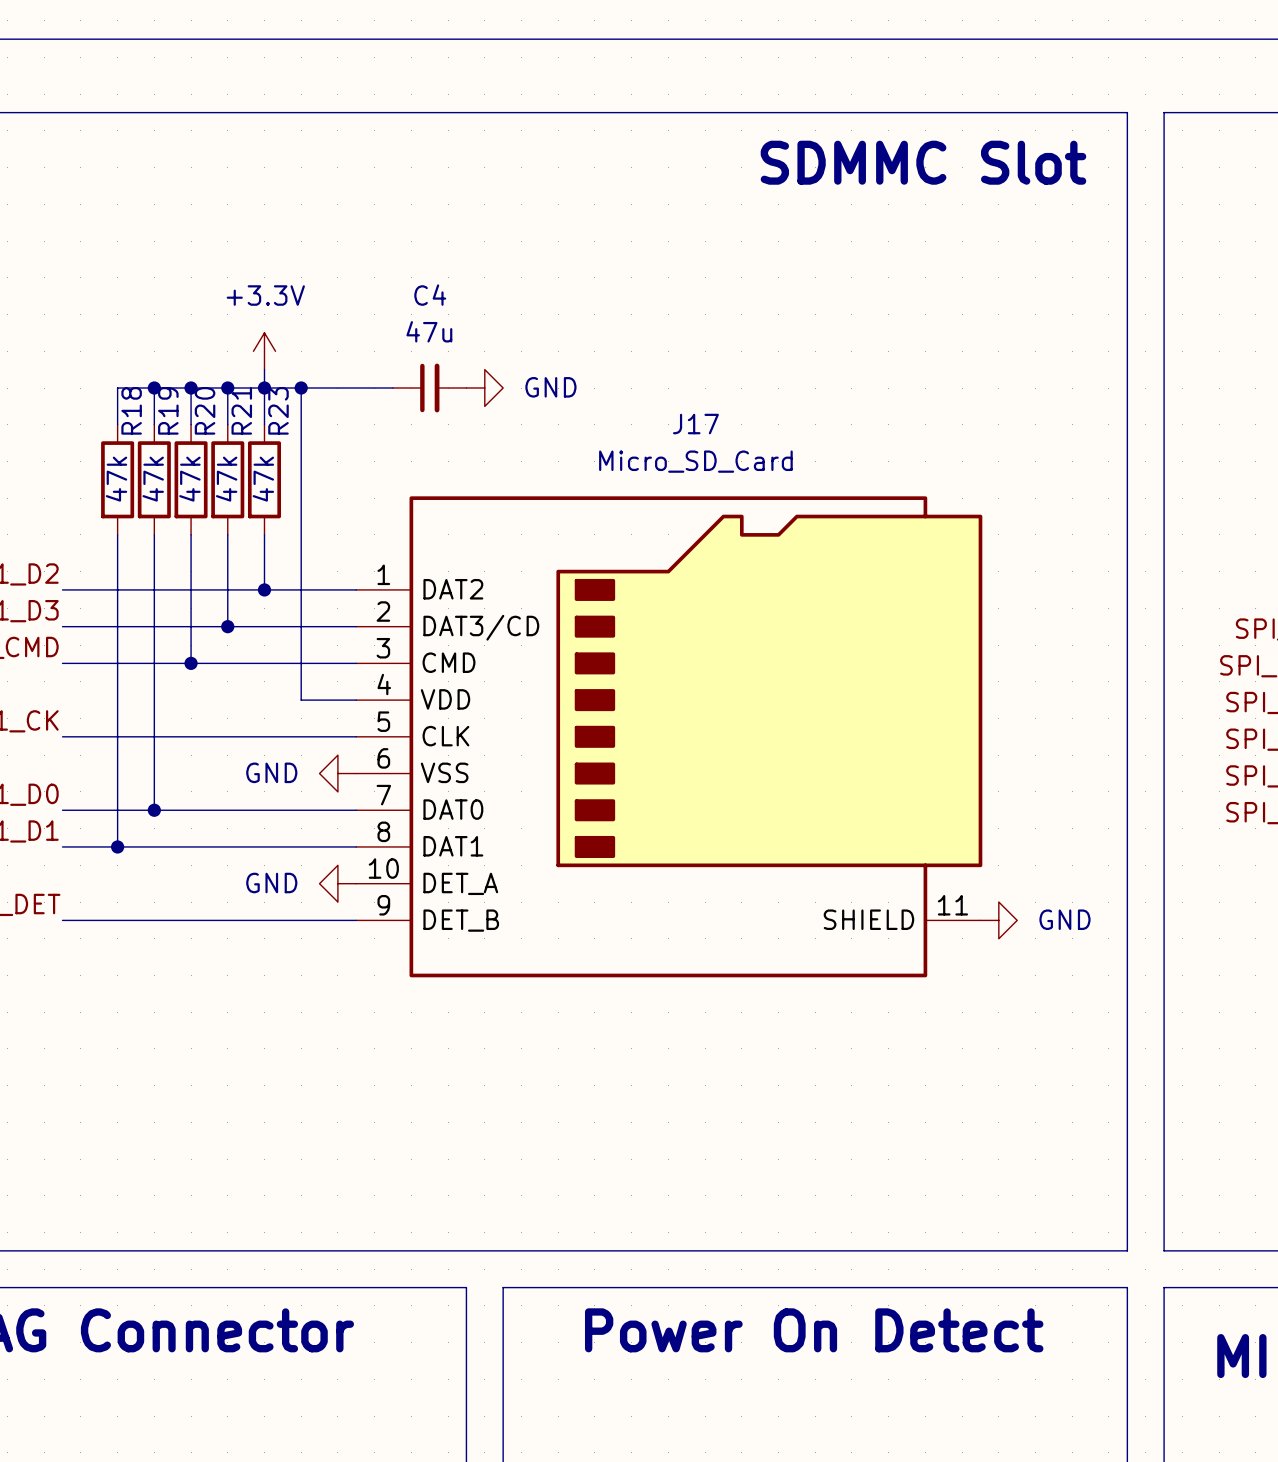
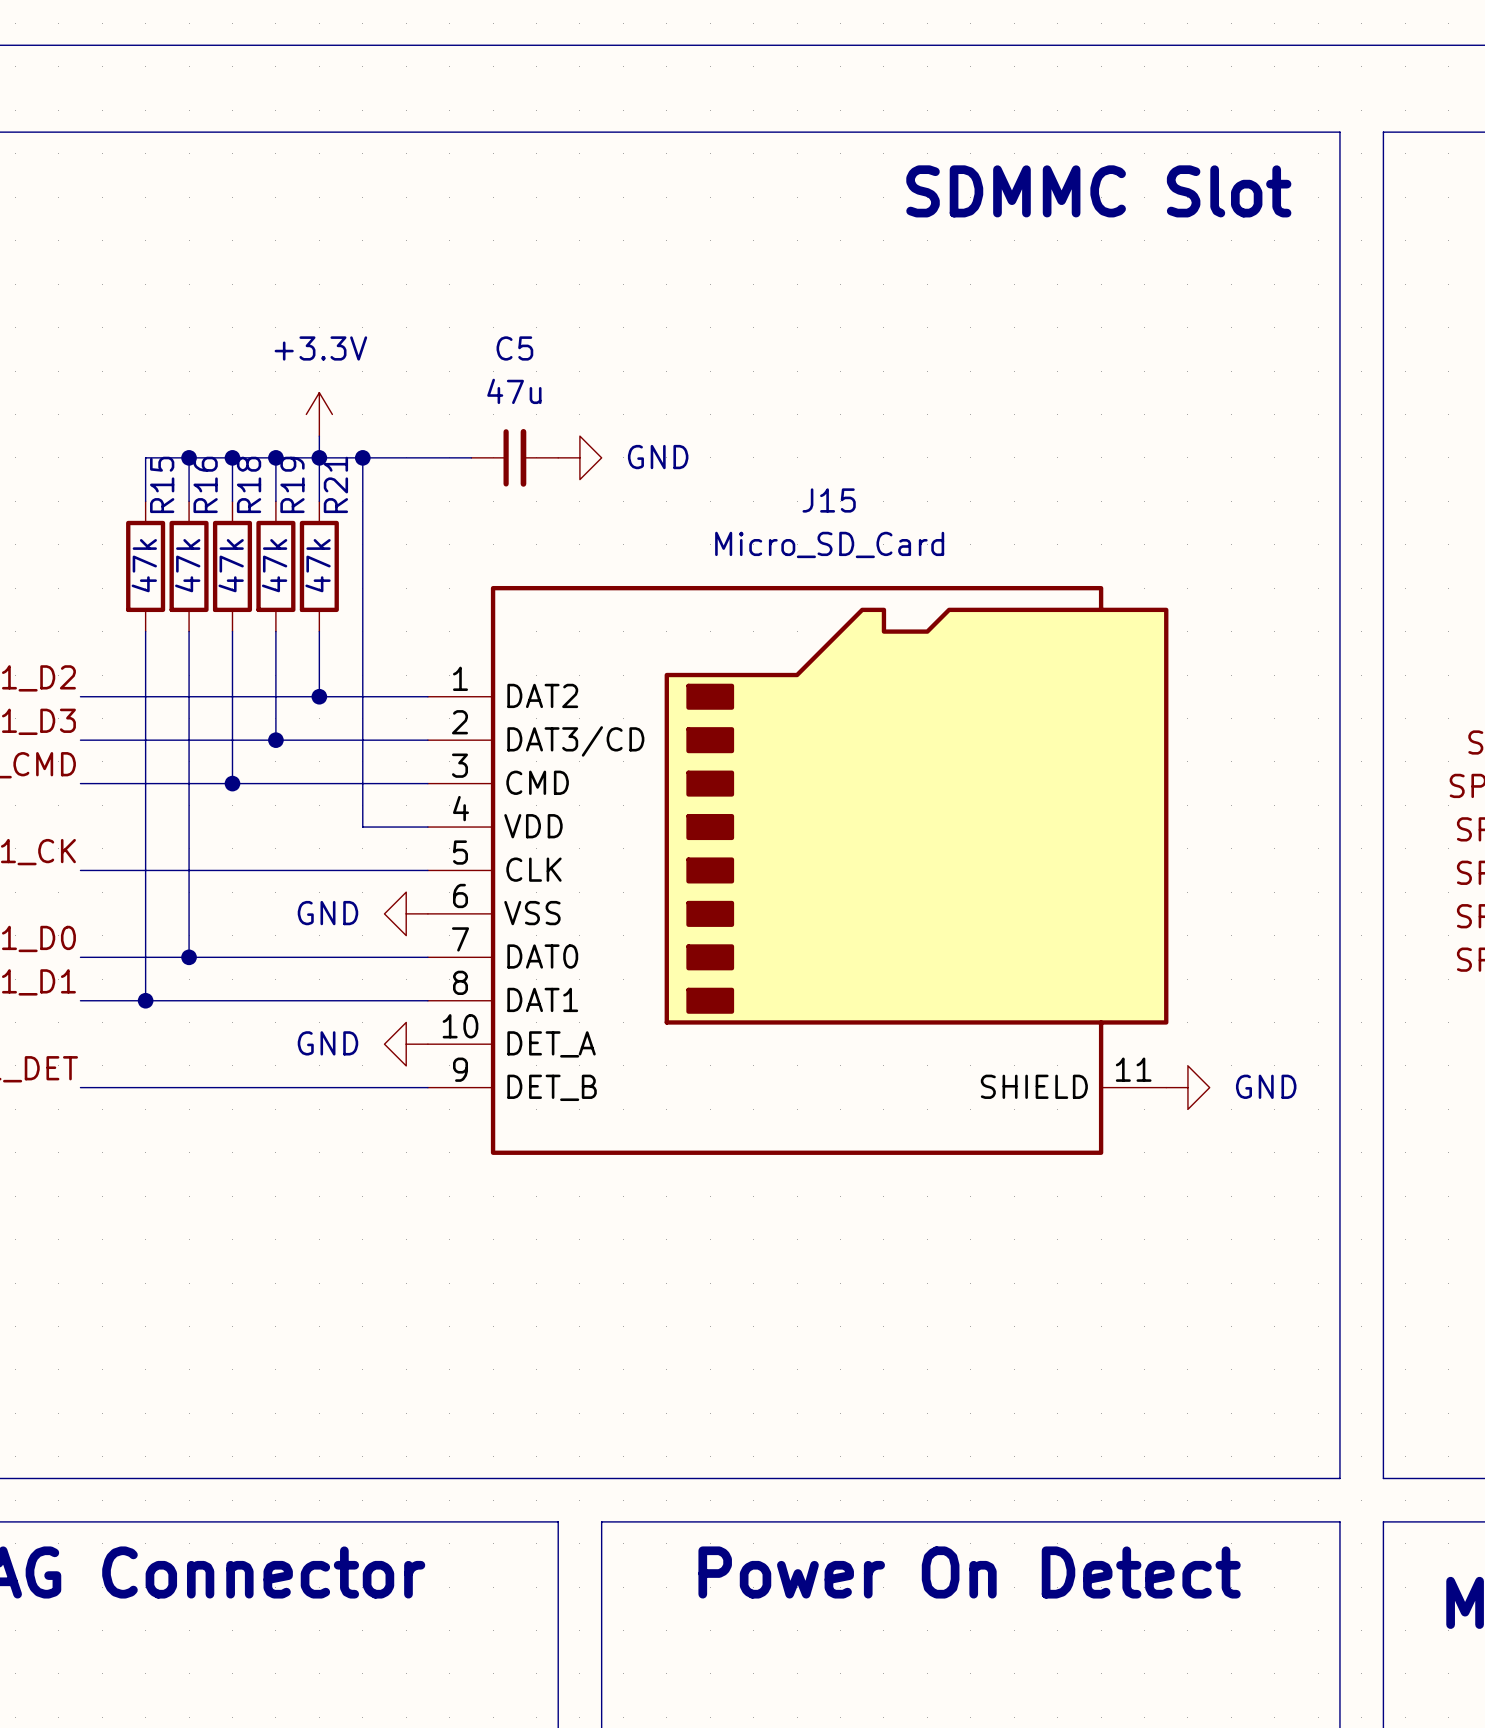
C4 name: C4 (430, 295) -> C5 (514, 348)
R18 name: R18 (131, 410) -> R15 (162, 484)
R19 name: R19 (168, 410) -> R16 (205, 484)
R20 name: R20 (205, 410) -> R18 (249, 484)
R21 name: R21 (241, 410) -> R19 (292, 484)
R23 name: R23 (278, 410) -> R21 (335, 484)
J17 name: J17 (695, 424) -> J15 (829, 500)

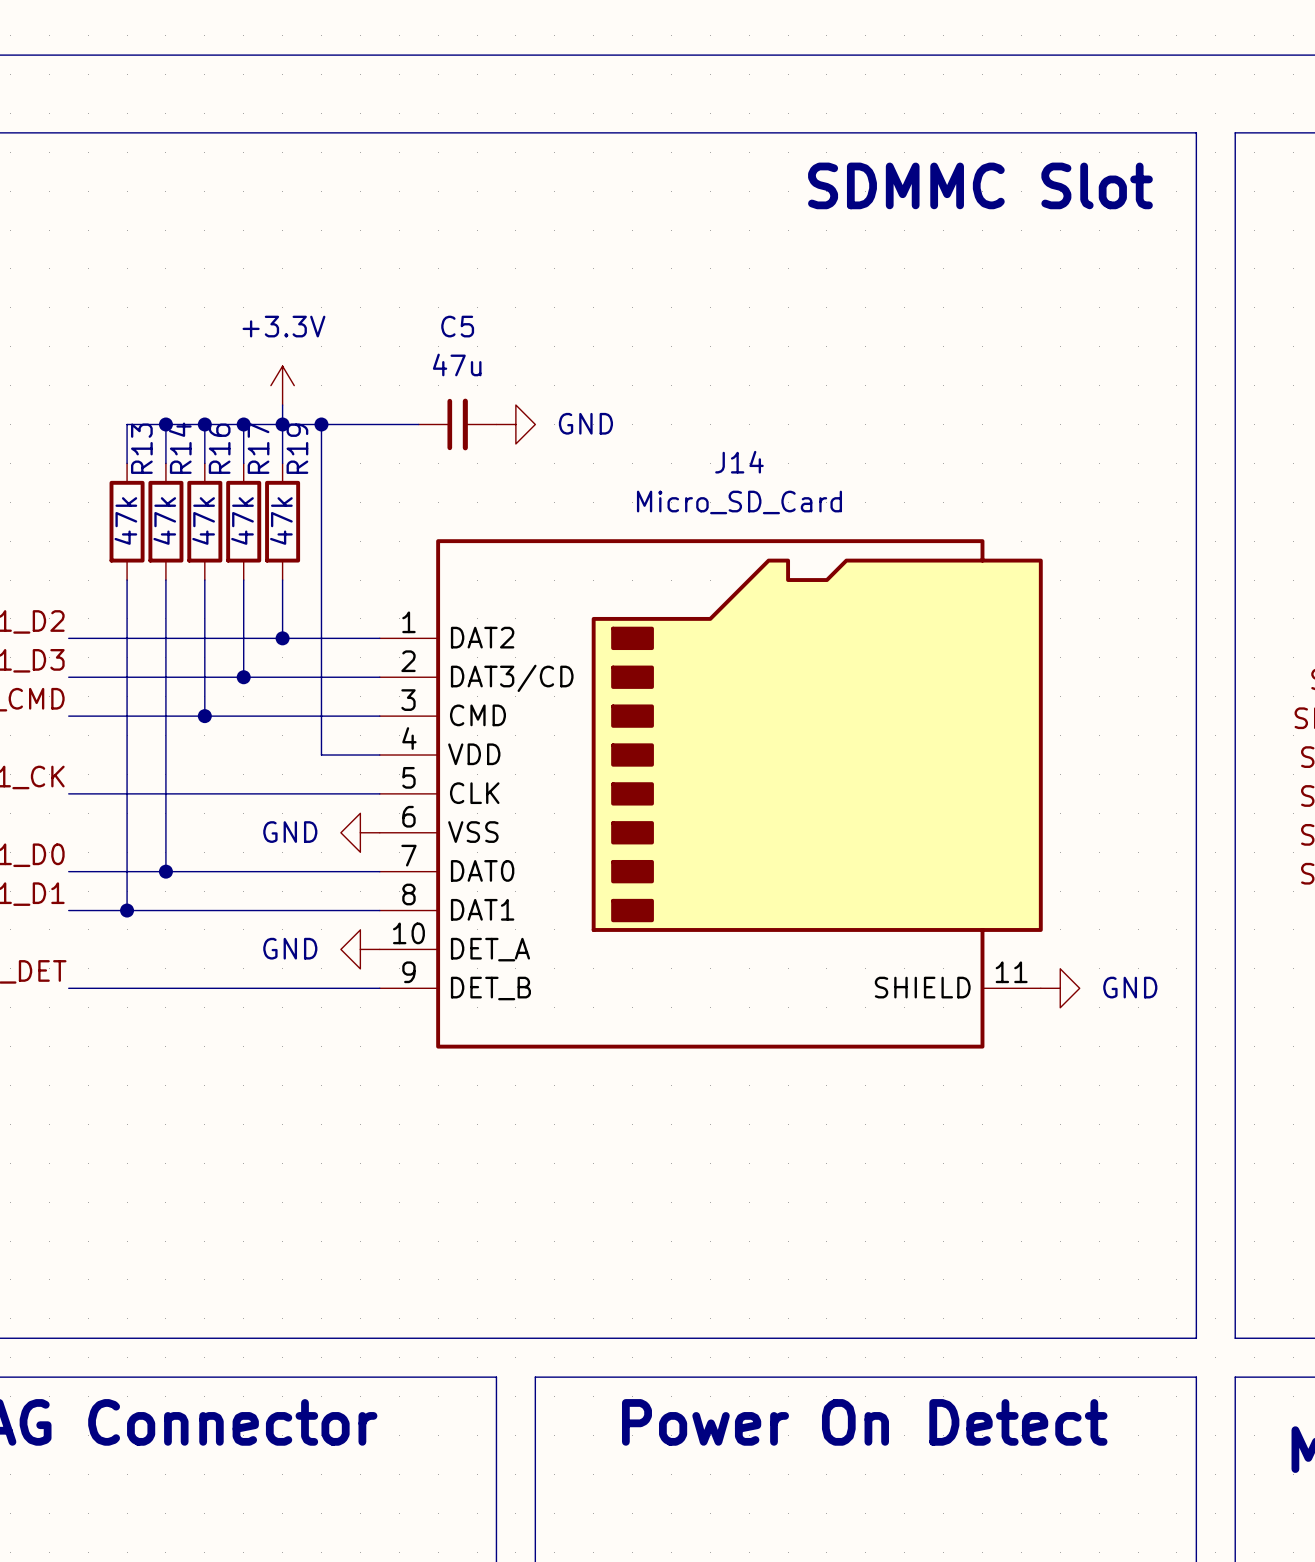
R15 name: R15 (162, 484) -> R13 (141, 448)
R16 name: R16 (205, 484) -> R14 (180, 448)
R18 name: R18 (249, 484) -> R16 (219, 448)
R19 name: R19 (292, 484) -> R17 (258, 448)
R21 name: R21 (335, 484) -> R19 (297, 448)
J15 name: J15 (829, 500) -> J14 (739, 462)

